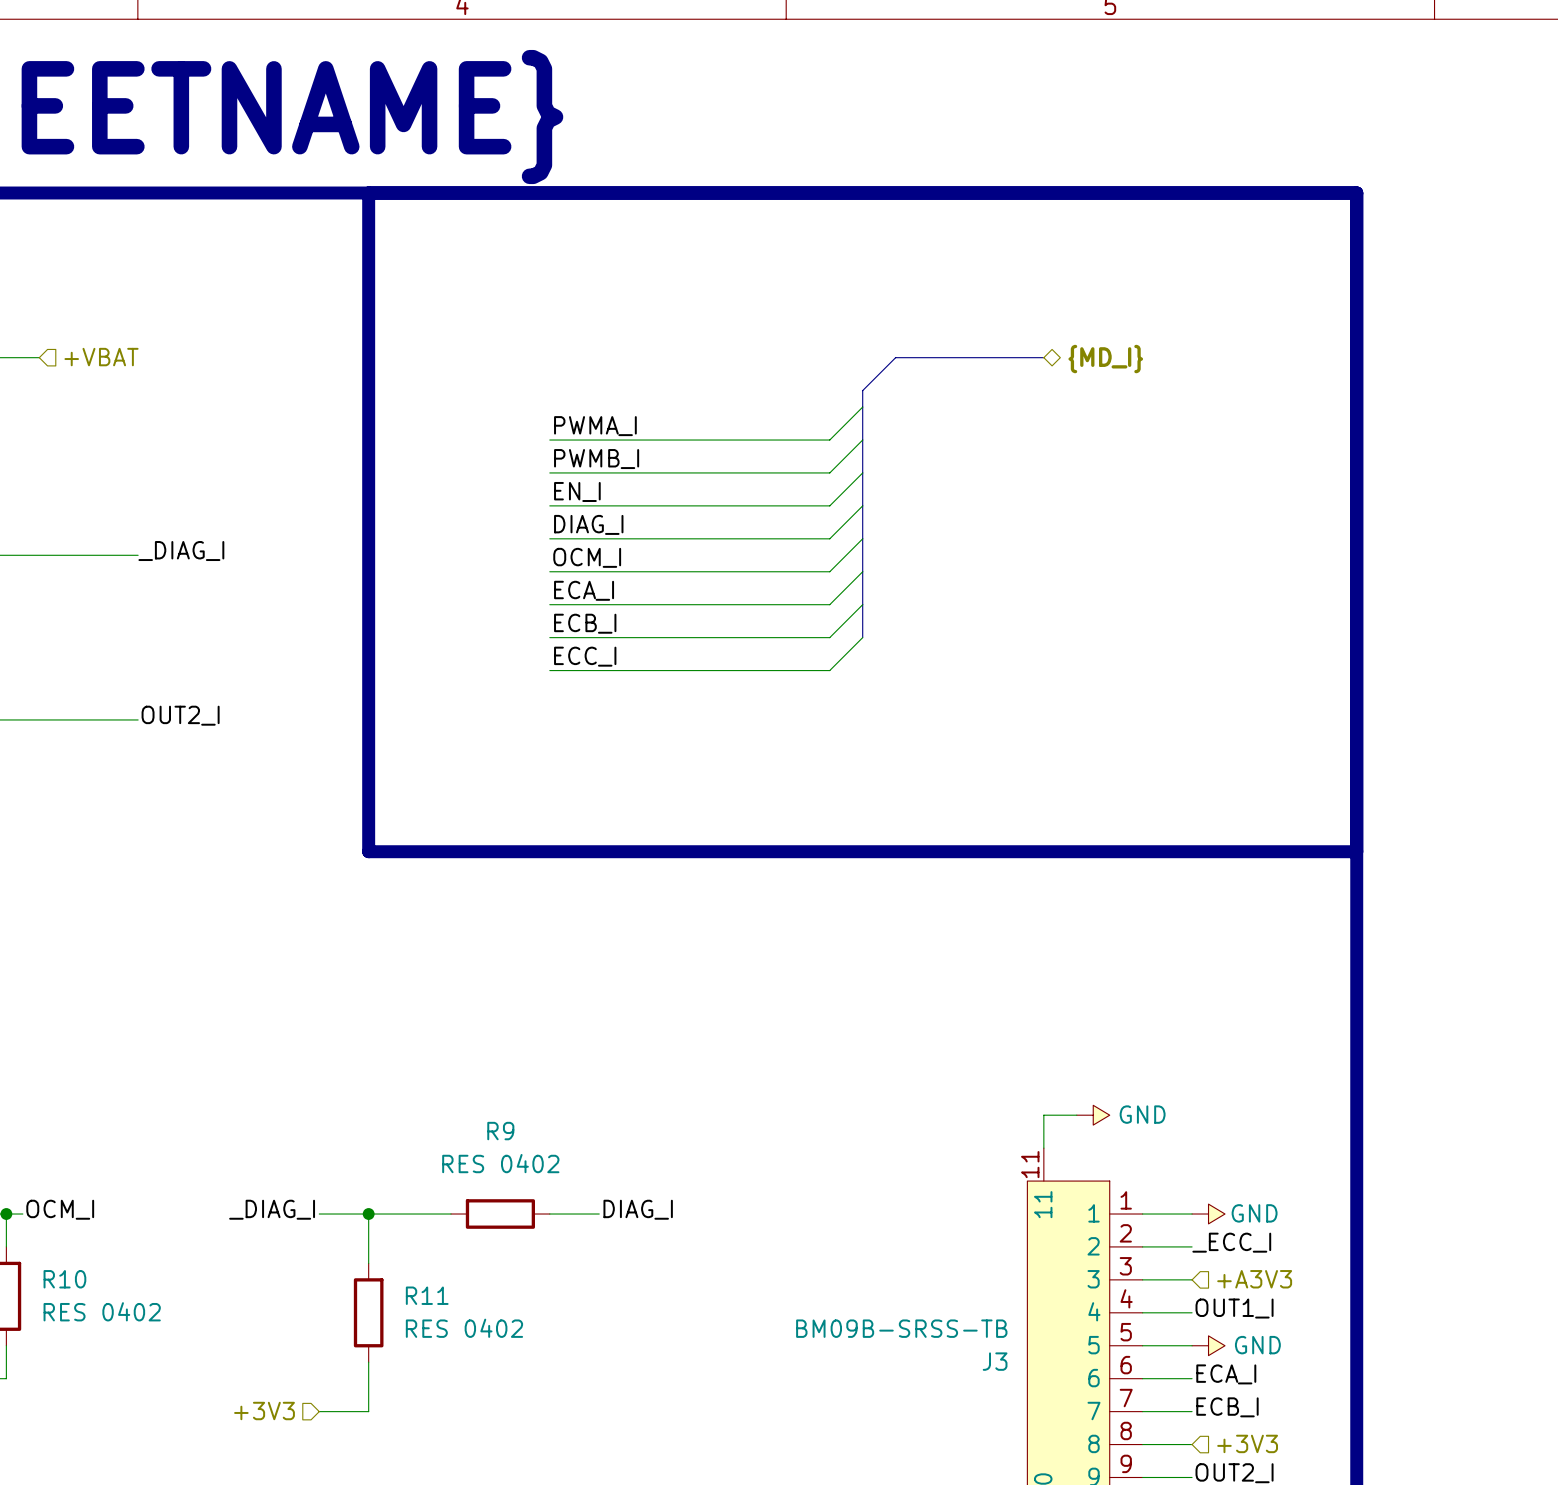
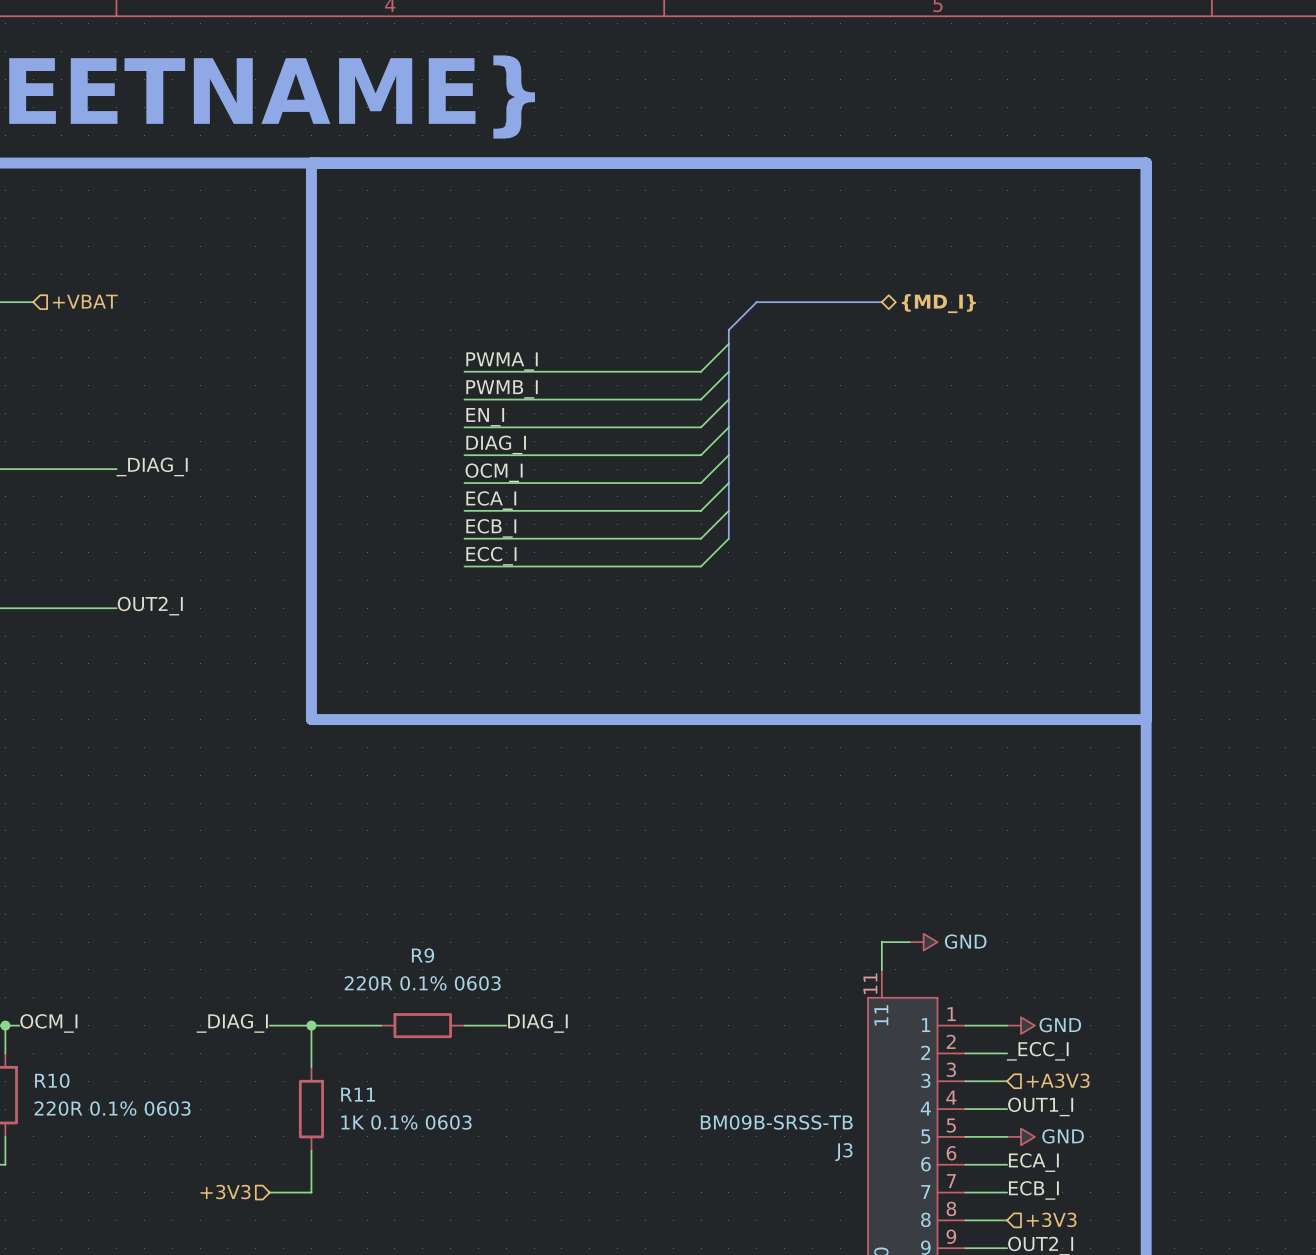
R9 value: RES 0402 (500, 1163) -> 220R 0.1% 0603 (422, 983)
R10 value: RES 0402 (102, 1311) -> 220R 0.1% 0603 (112, 1108)
R11 value: RES 0402 (464, 1328) -> 1K 0.1% 0603 (406, 1122)

